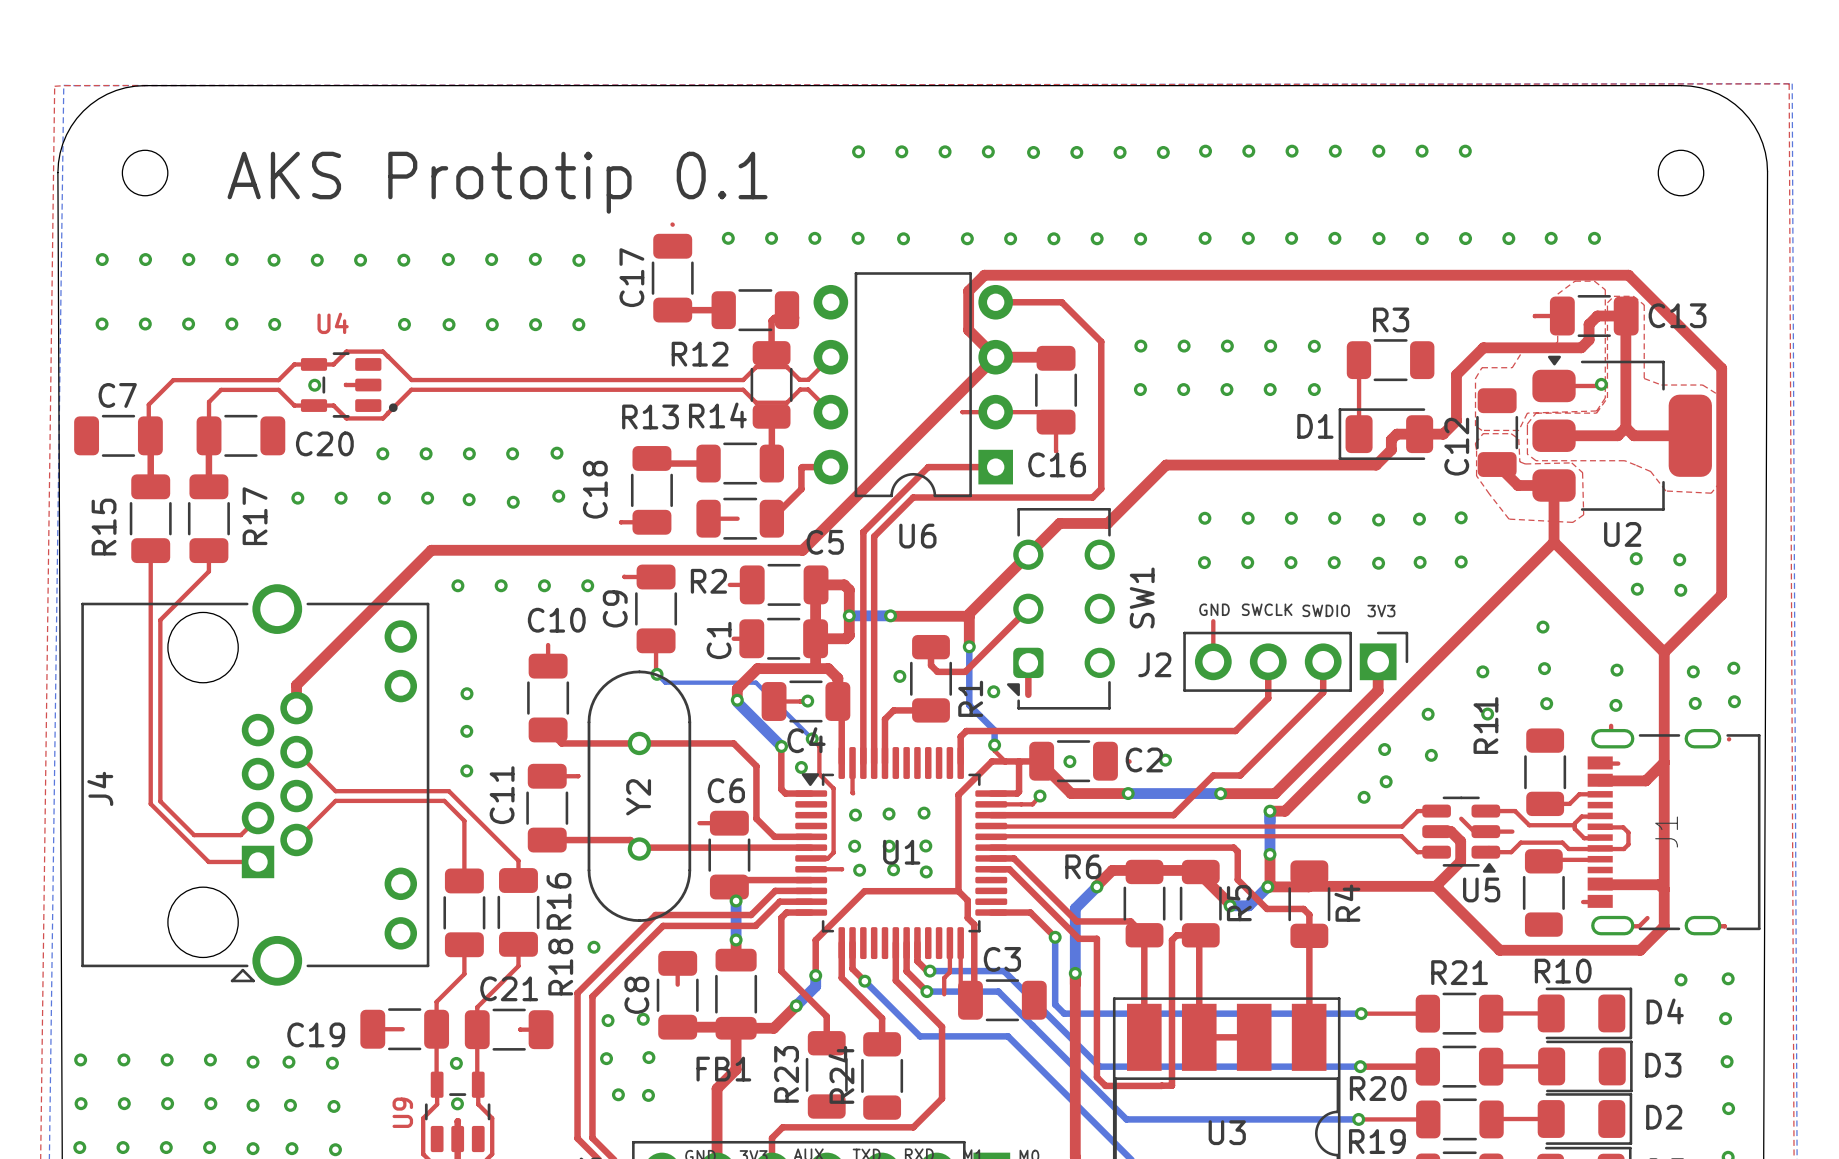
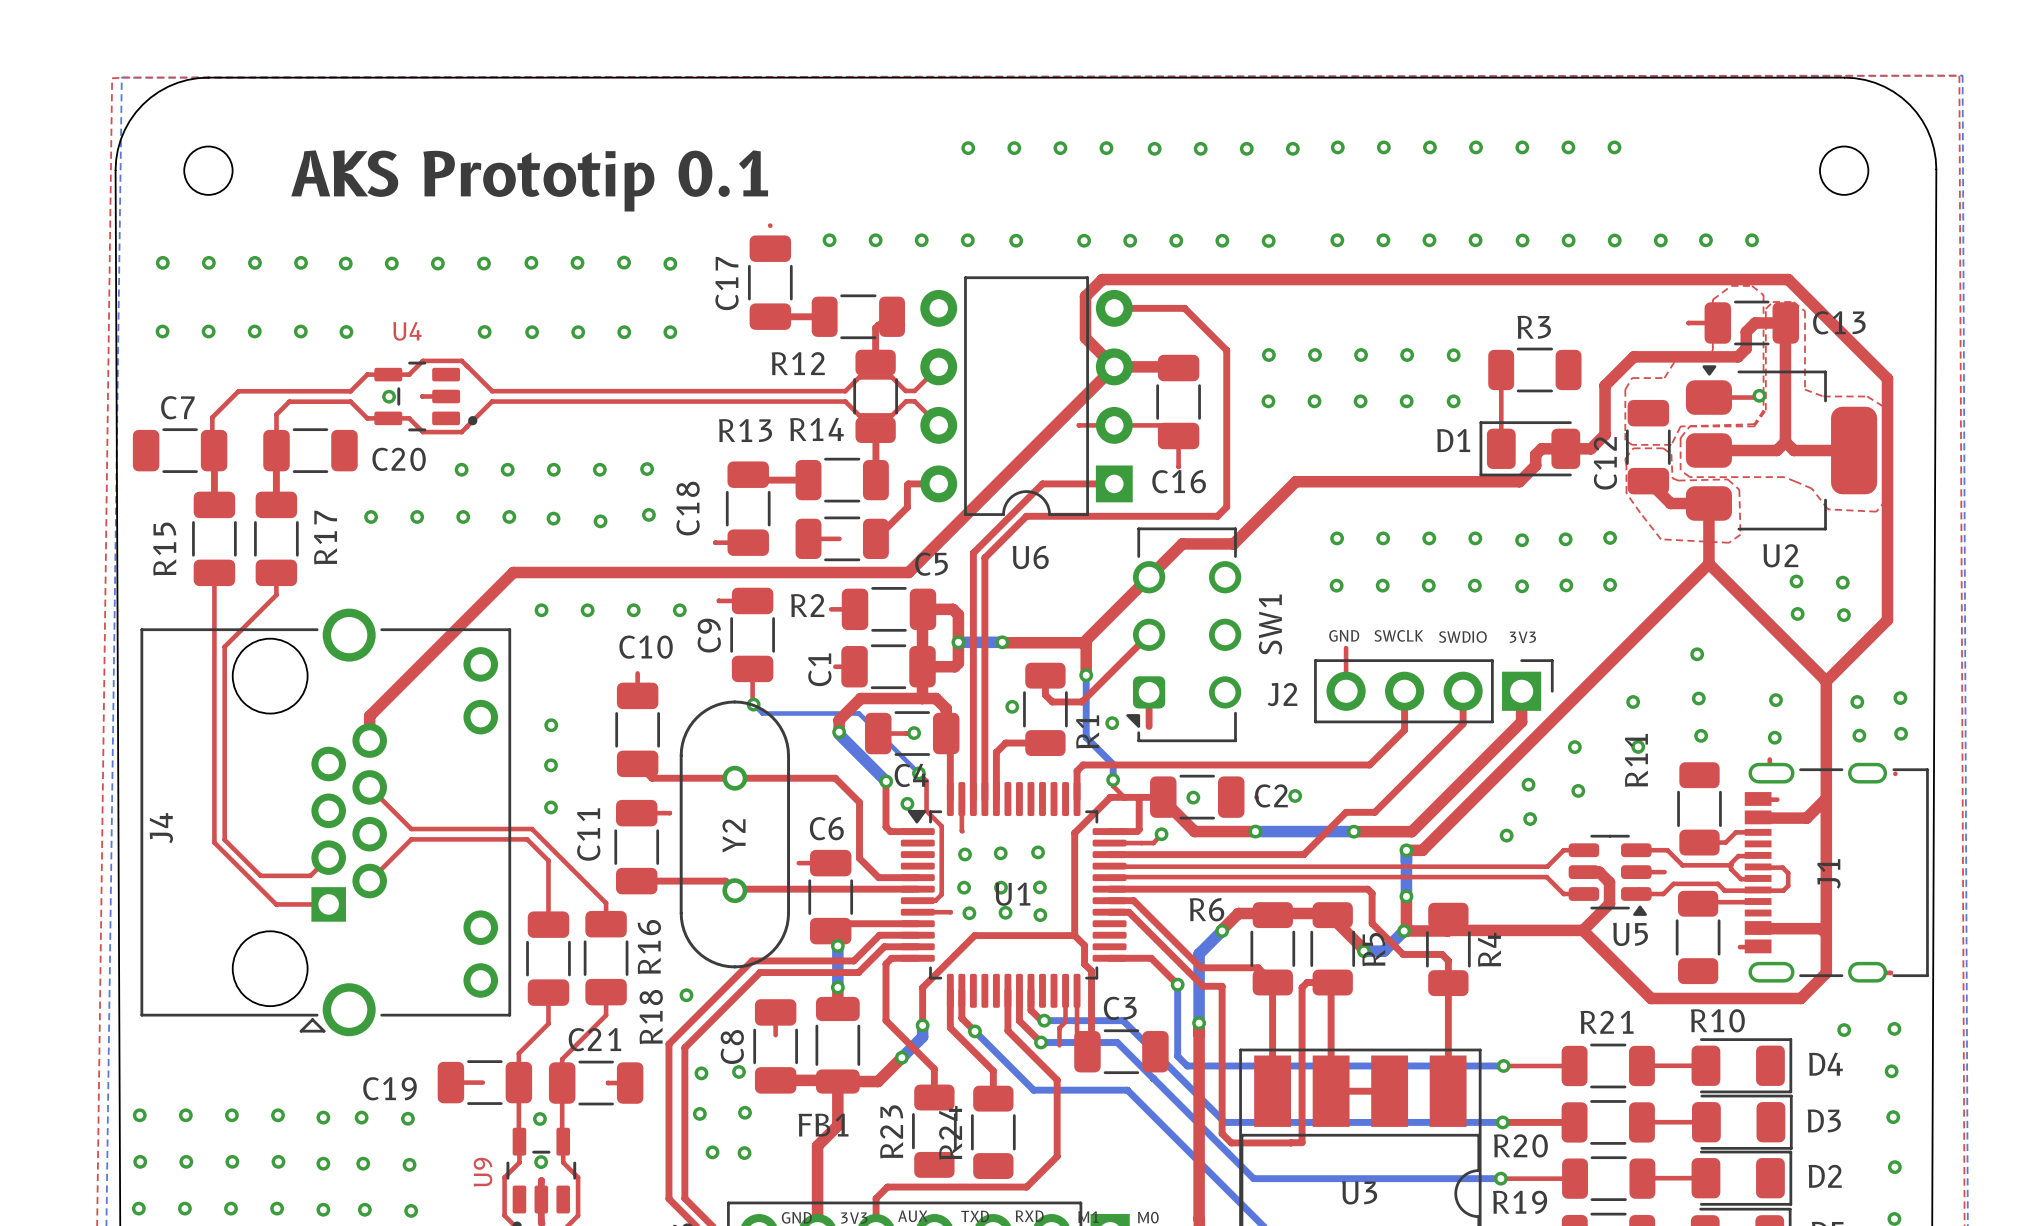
top track: (1461, 818) (1474, 831) -> none
top track: (1647, 918) (1639, 926) (1611, 926) -> none

